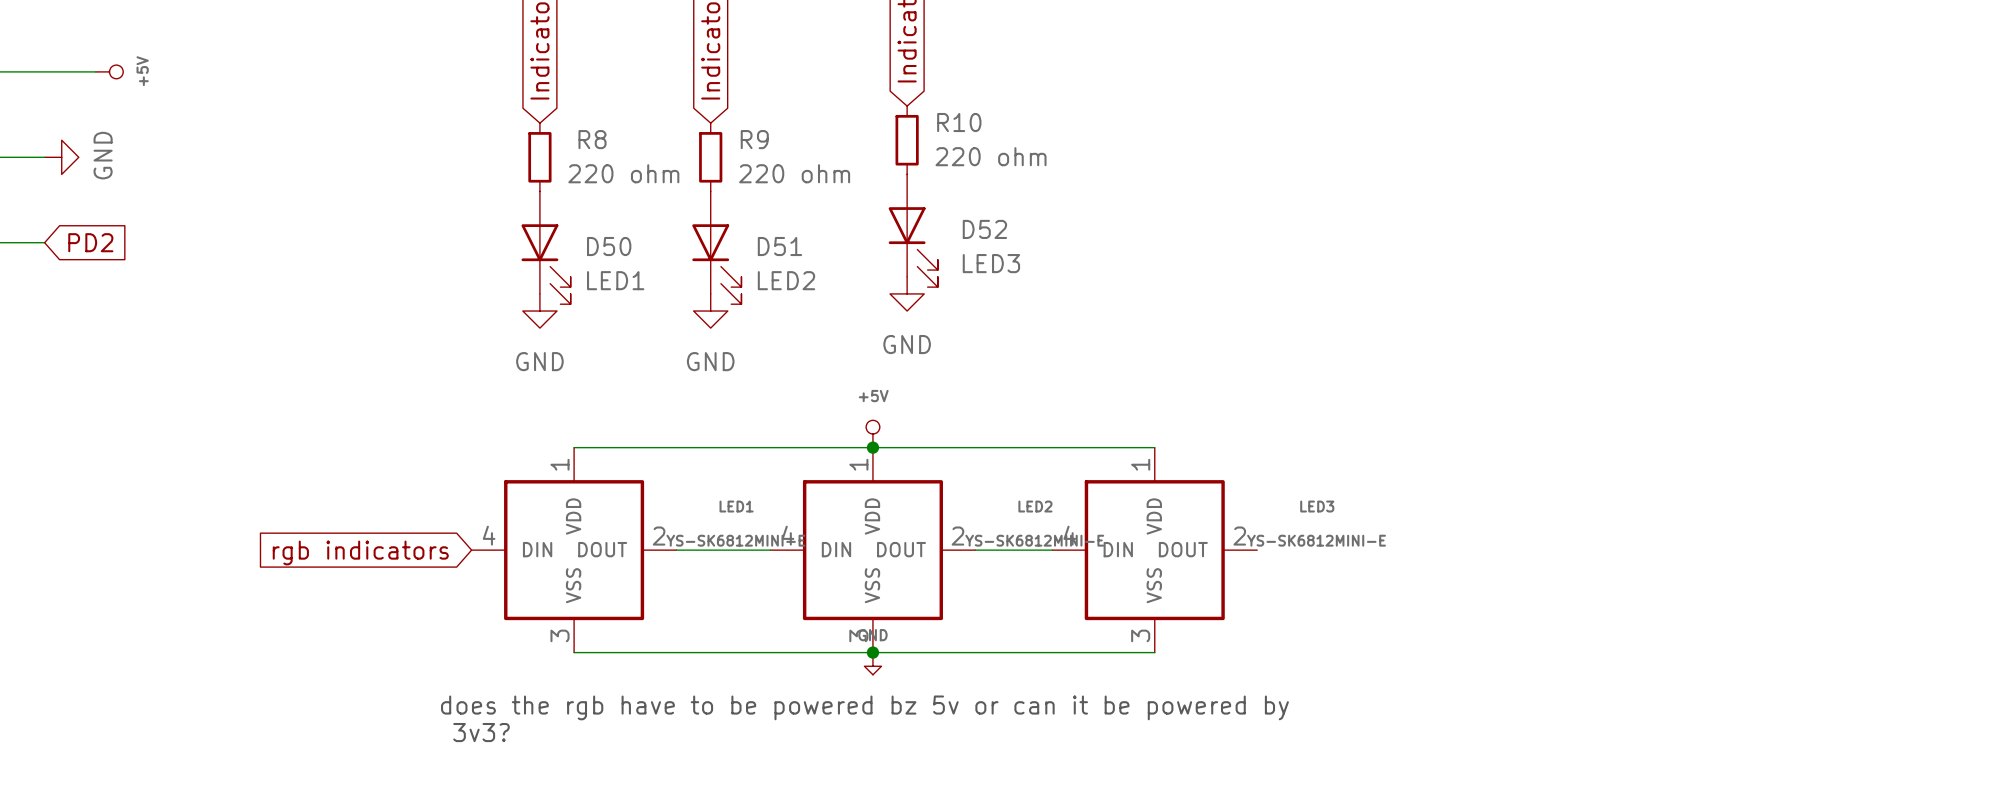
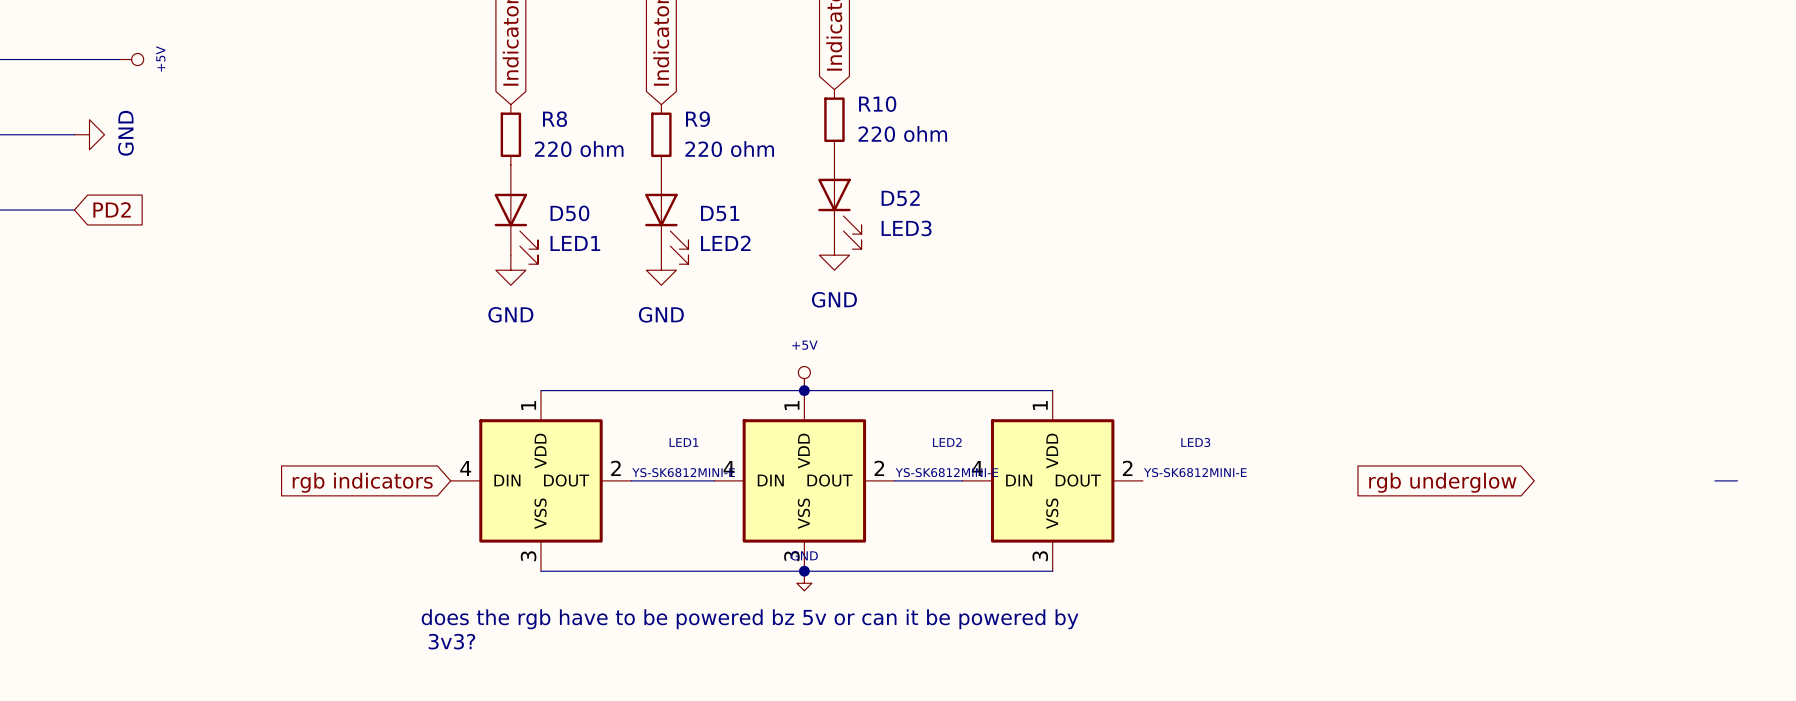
wire: none -> (1714, 480) (1737, 480)
global label: none -> rgb underglow (1442, 482)

